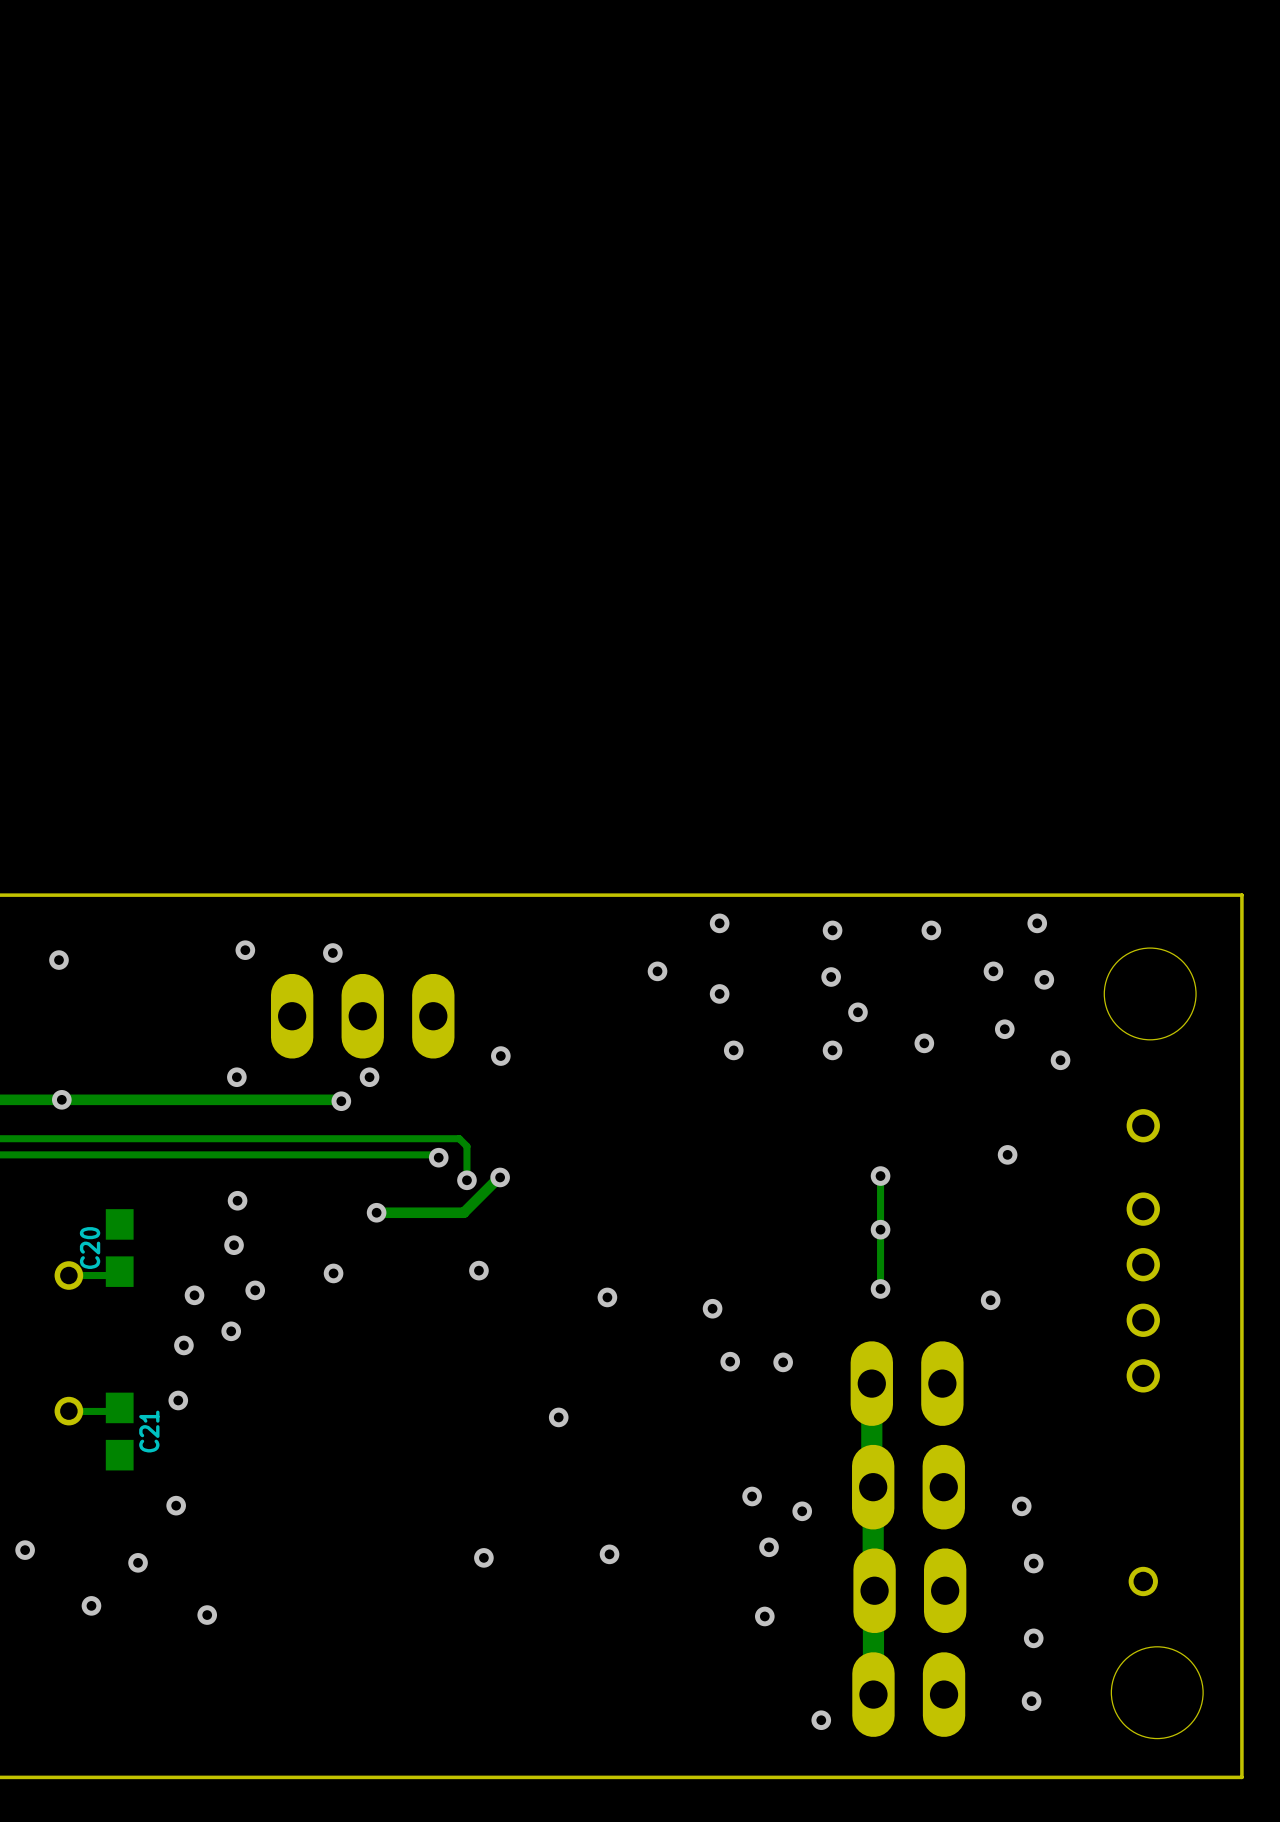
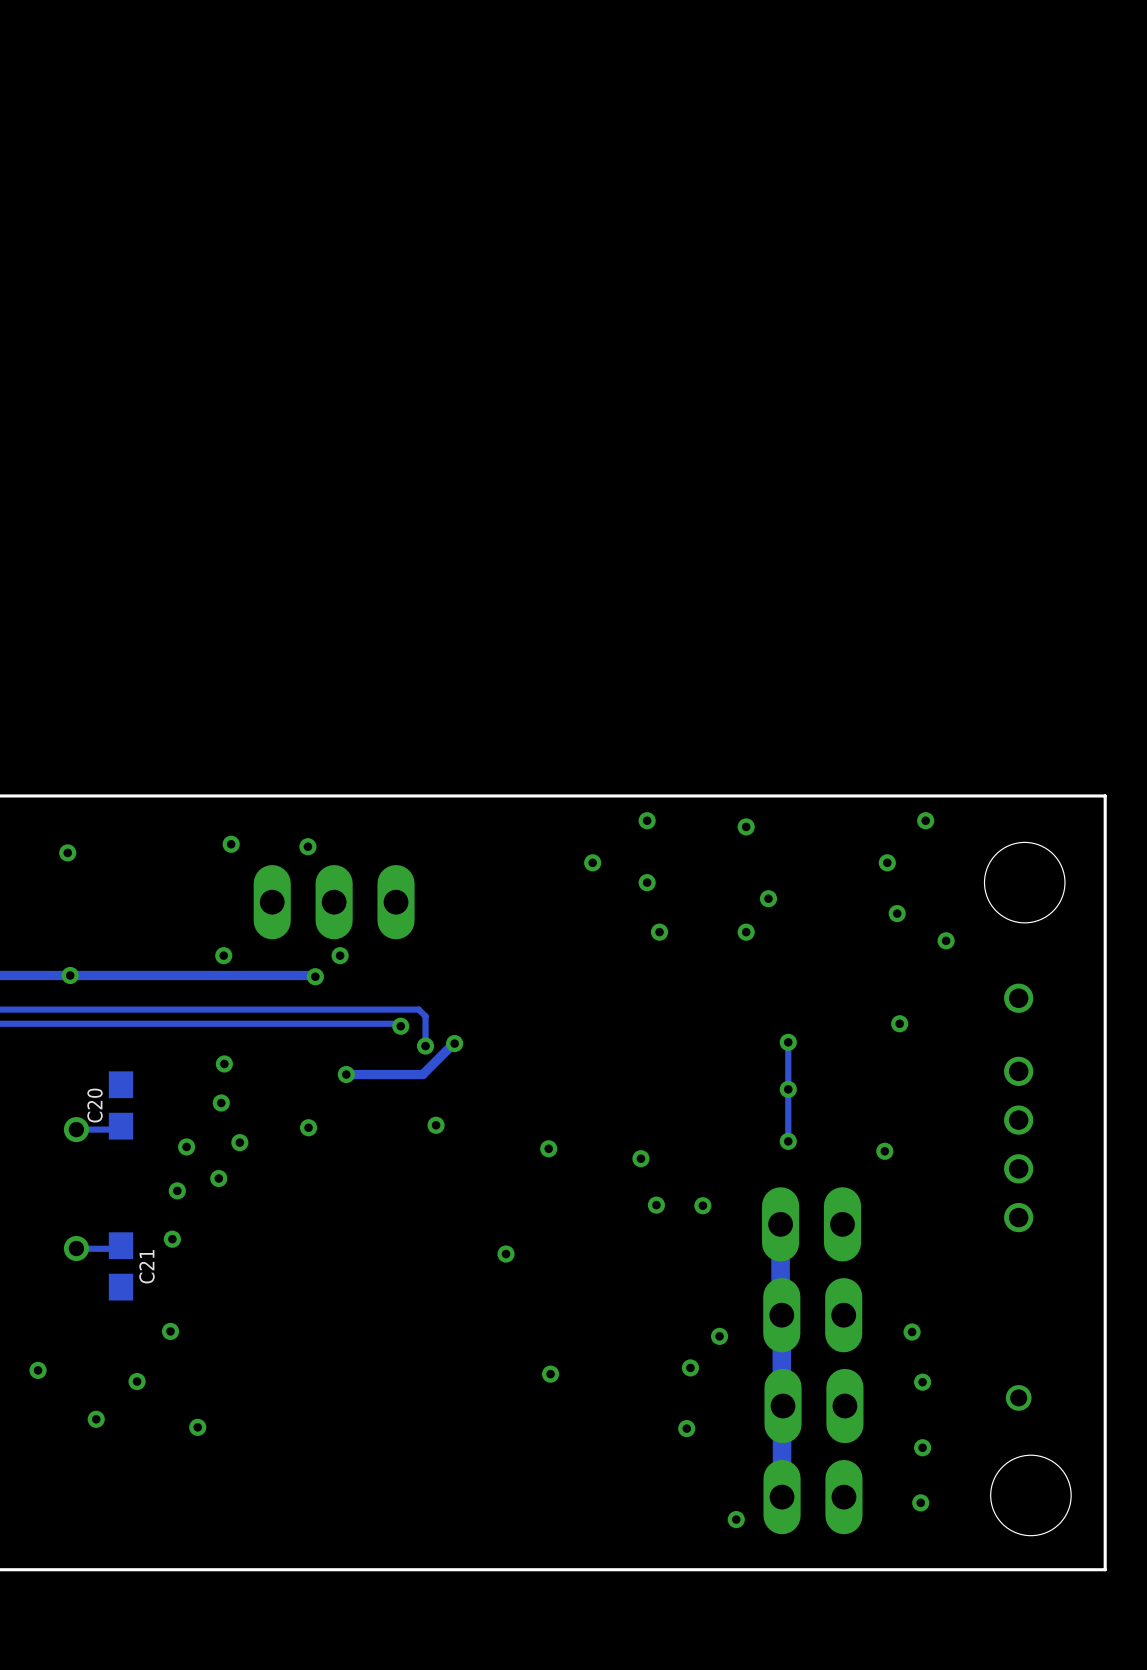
via: (931, 930) -> none
via: (831, 977) -> none
via: (1044, 979) -> none
via: (924, 1043) -> none
via: (500, 1056) -> none
via: (752, 1496) -> none
via: (483, 1557) -> none

